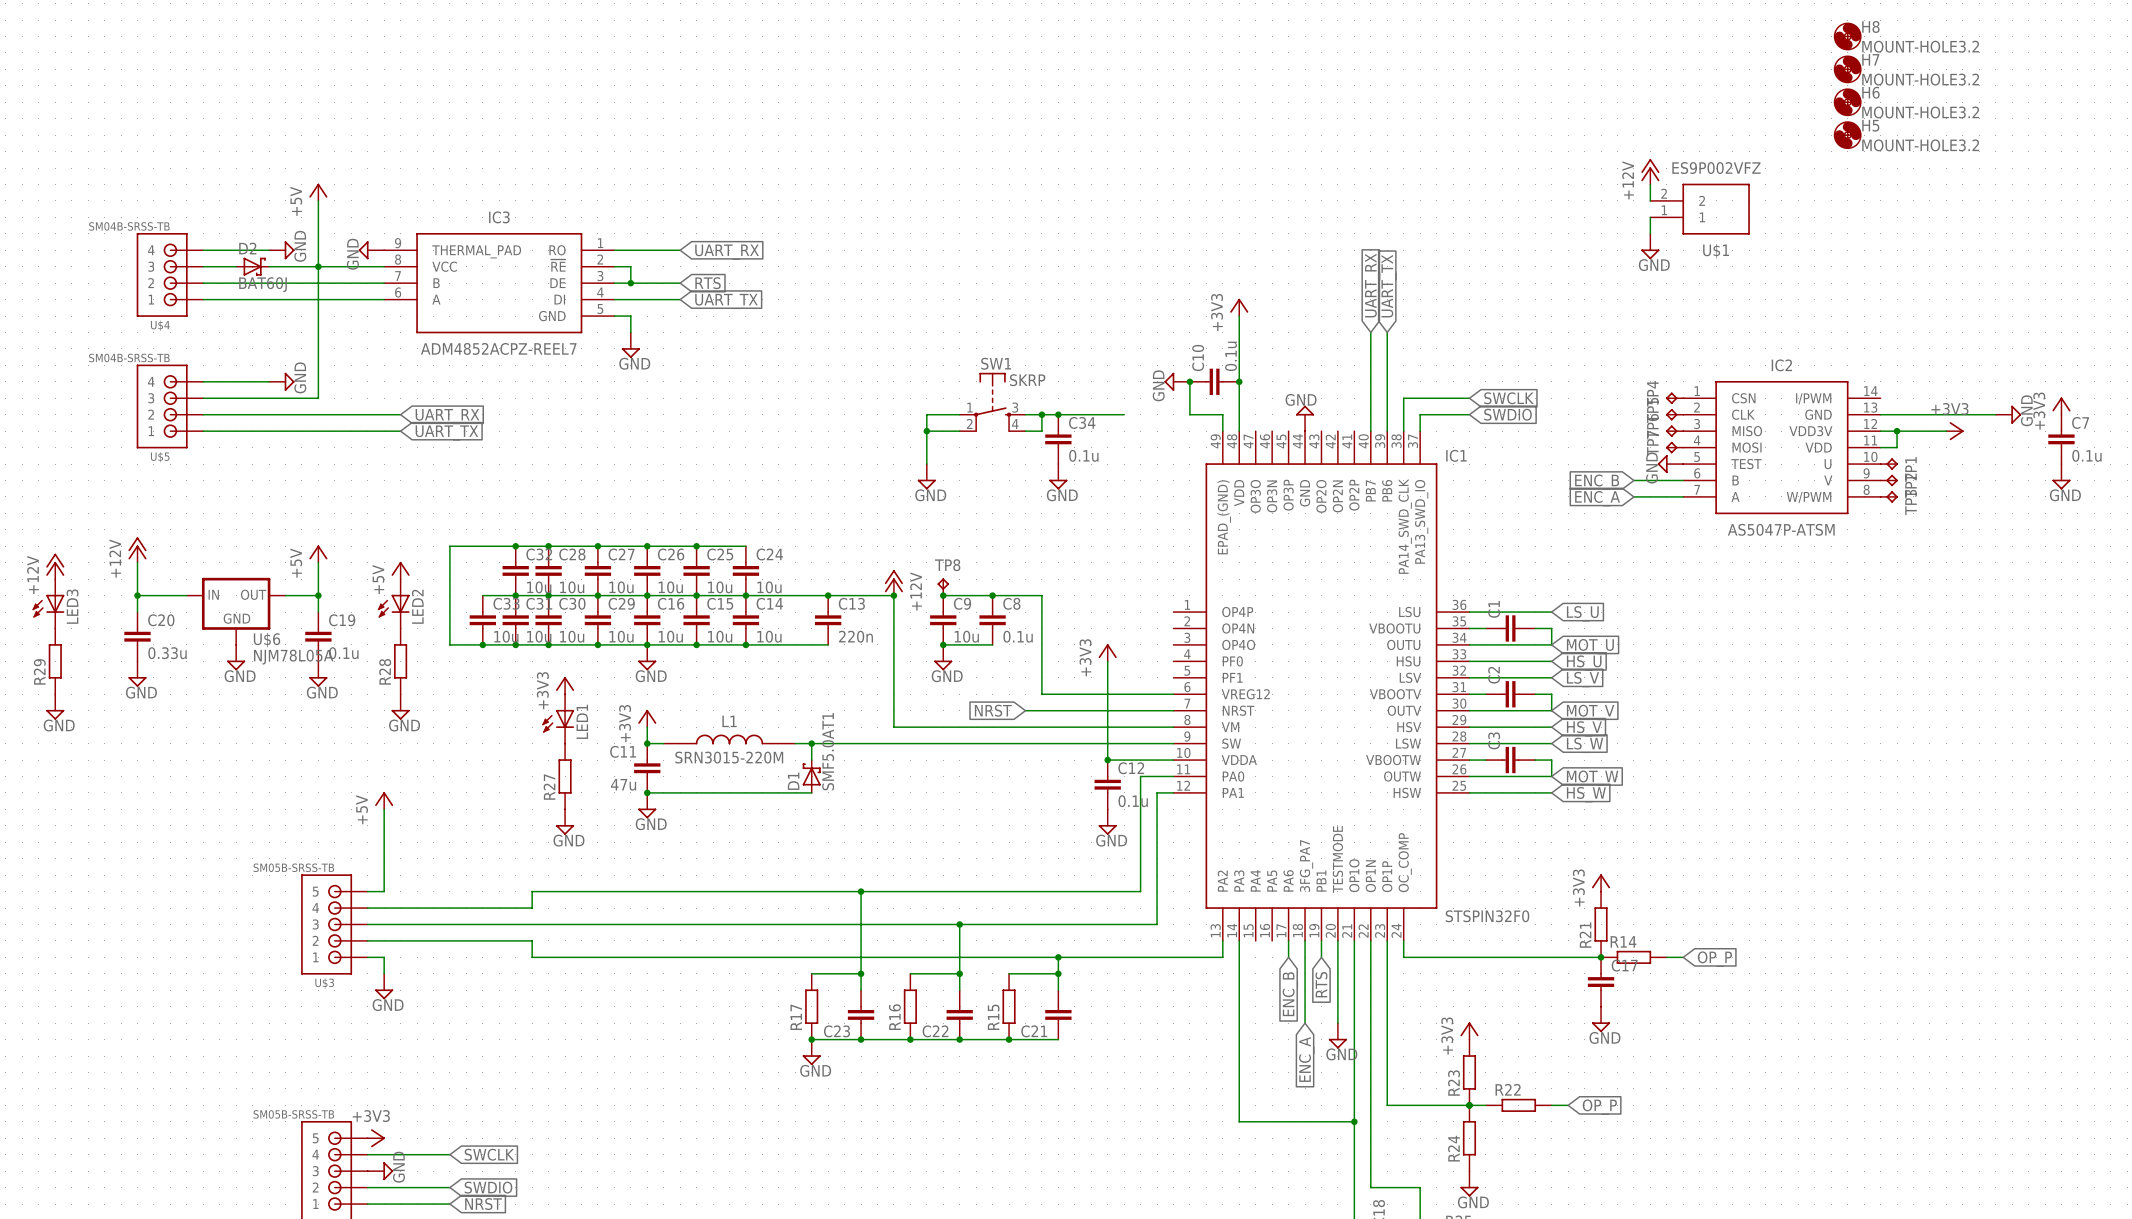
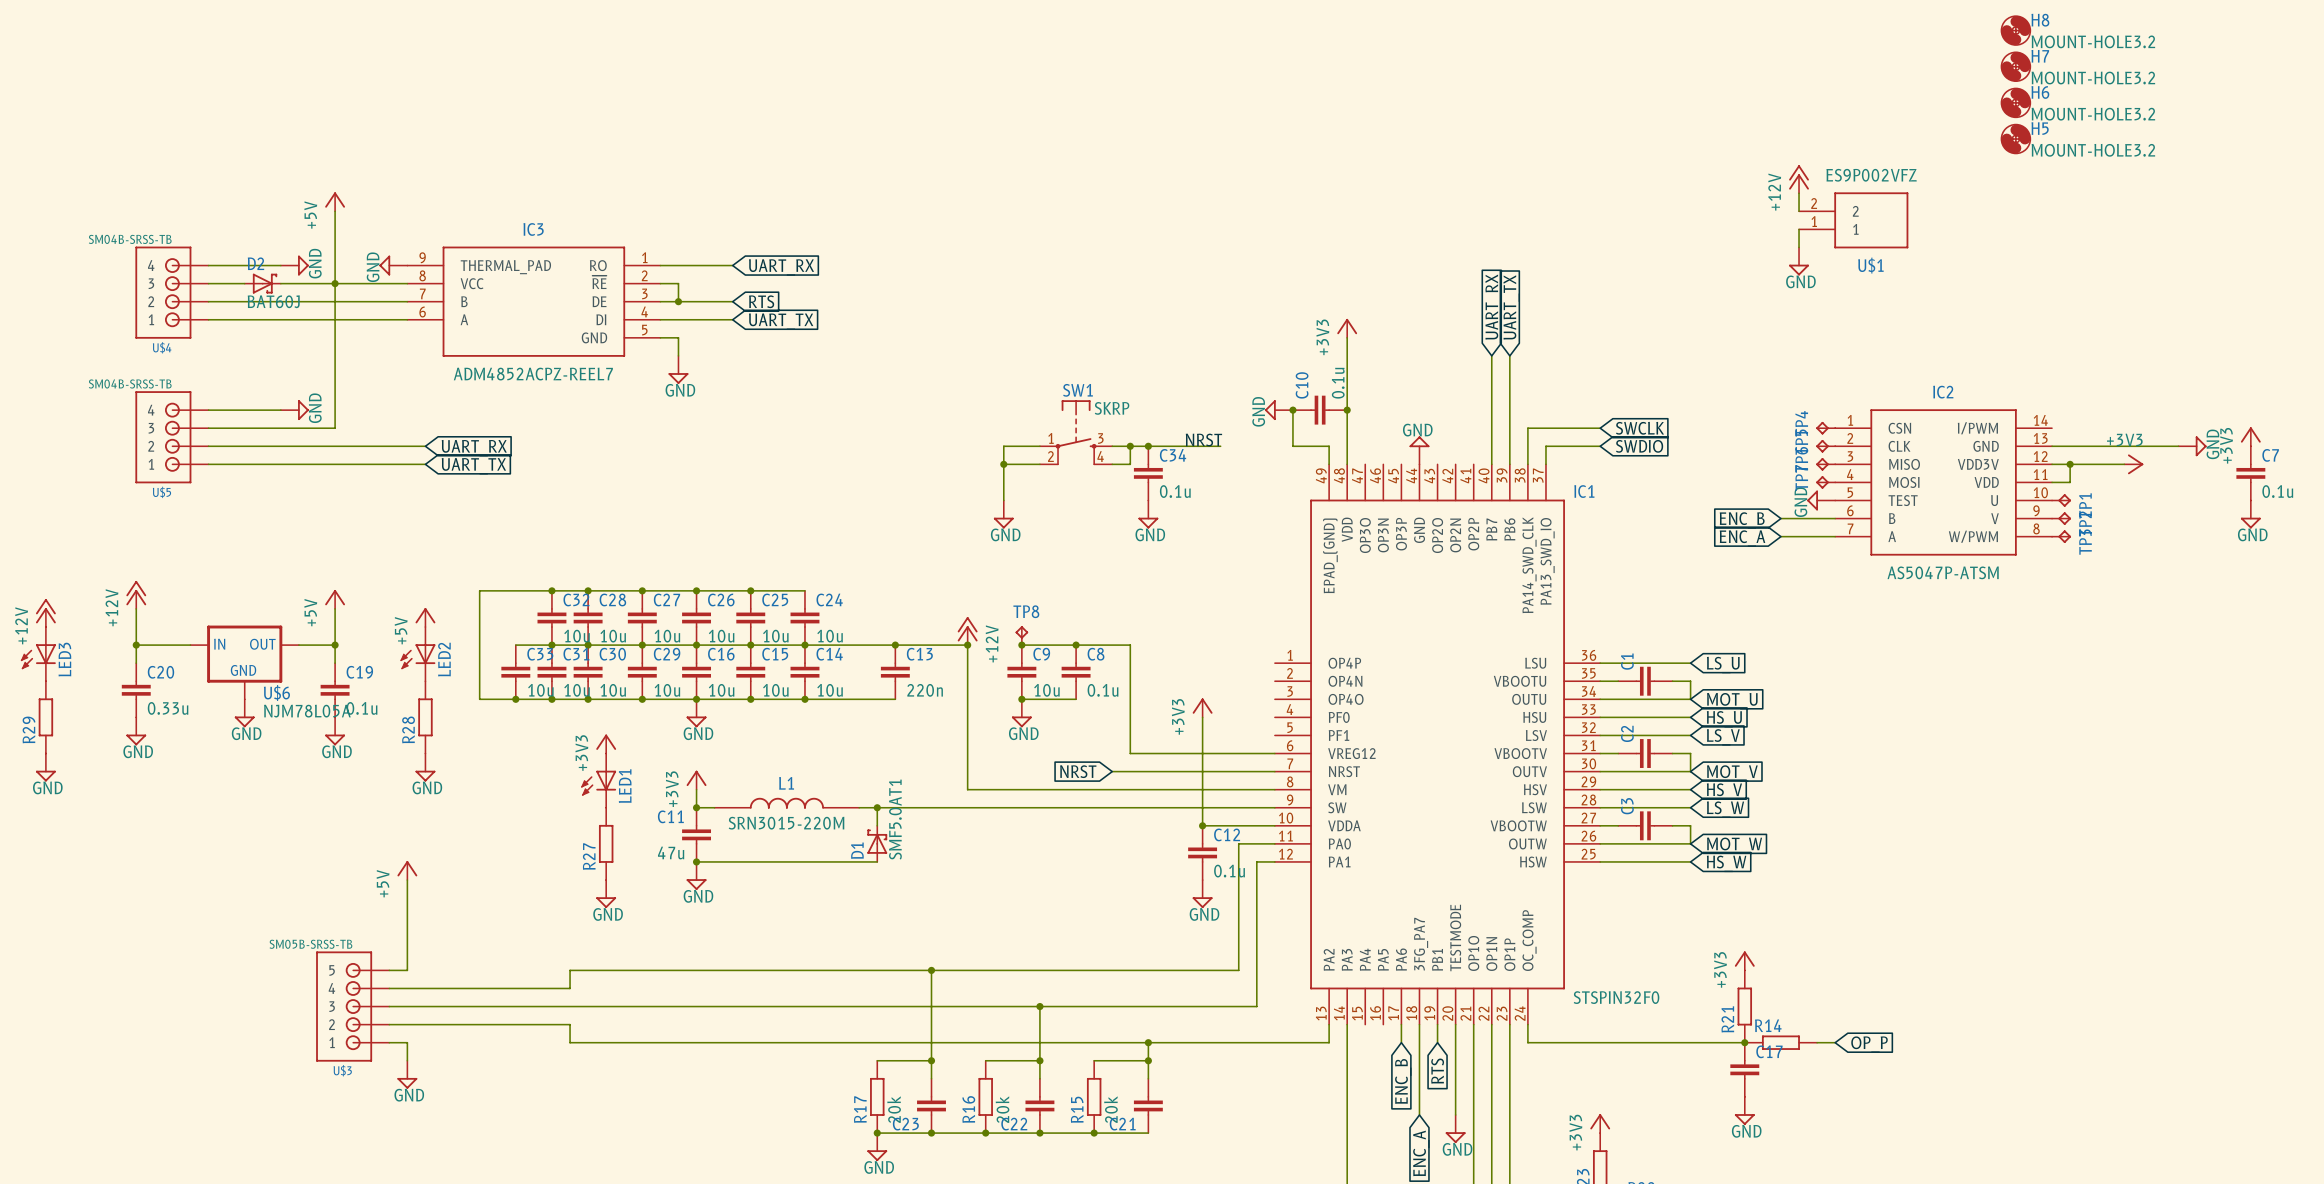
label: none -> NRST (1203, 440)
R17 value: none -> 20k (894, 1109)
R16 value: none -> 20k (1002, 1109)
R15 value: none -> 20k (1110, 1109)

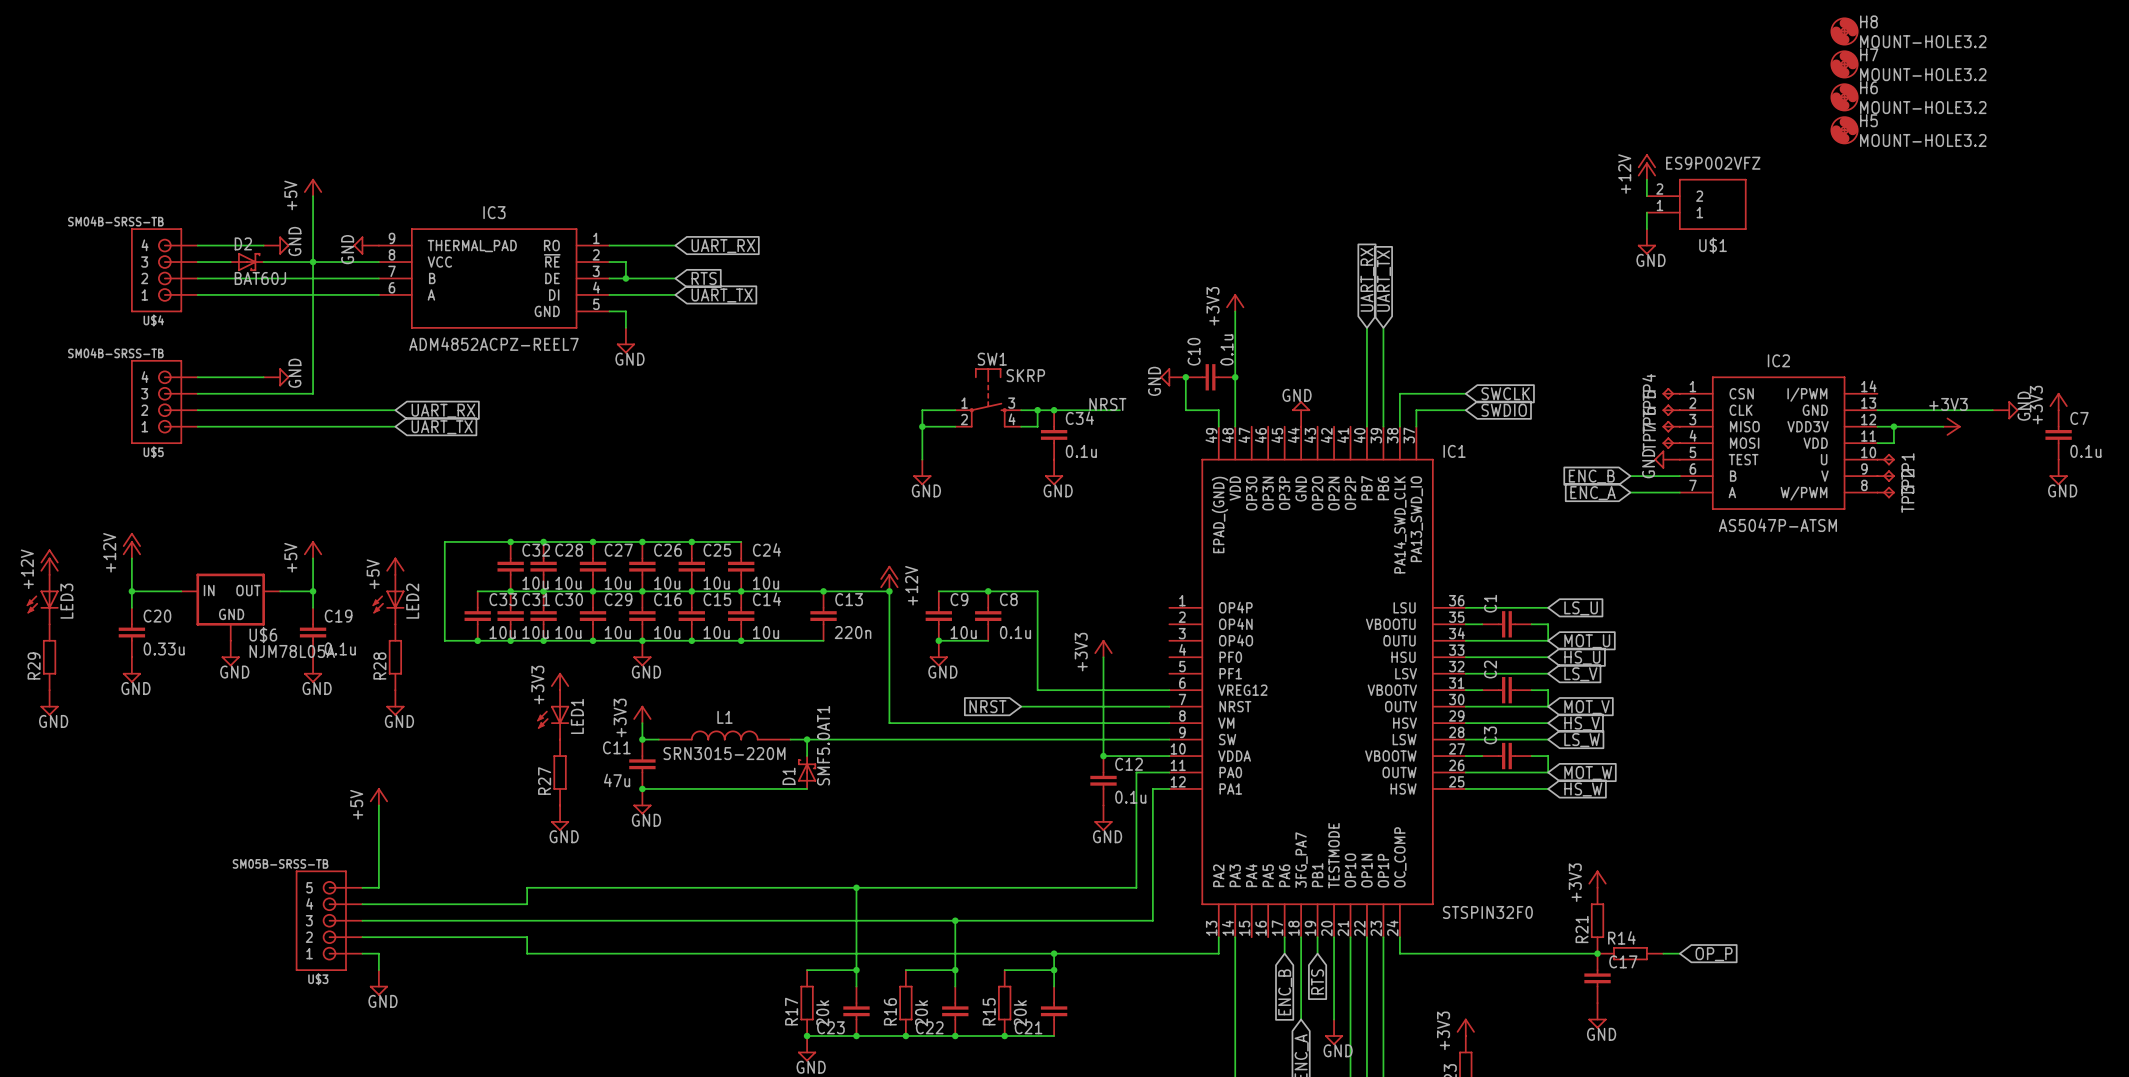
TP8: (1021, 635) -> none
junction: (1021, 645) -> none

